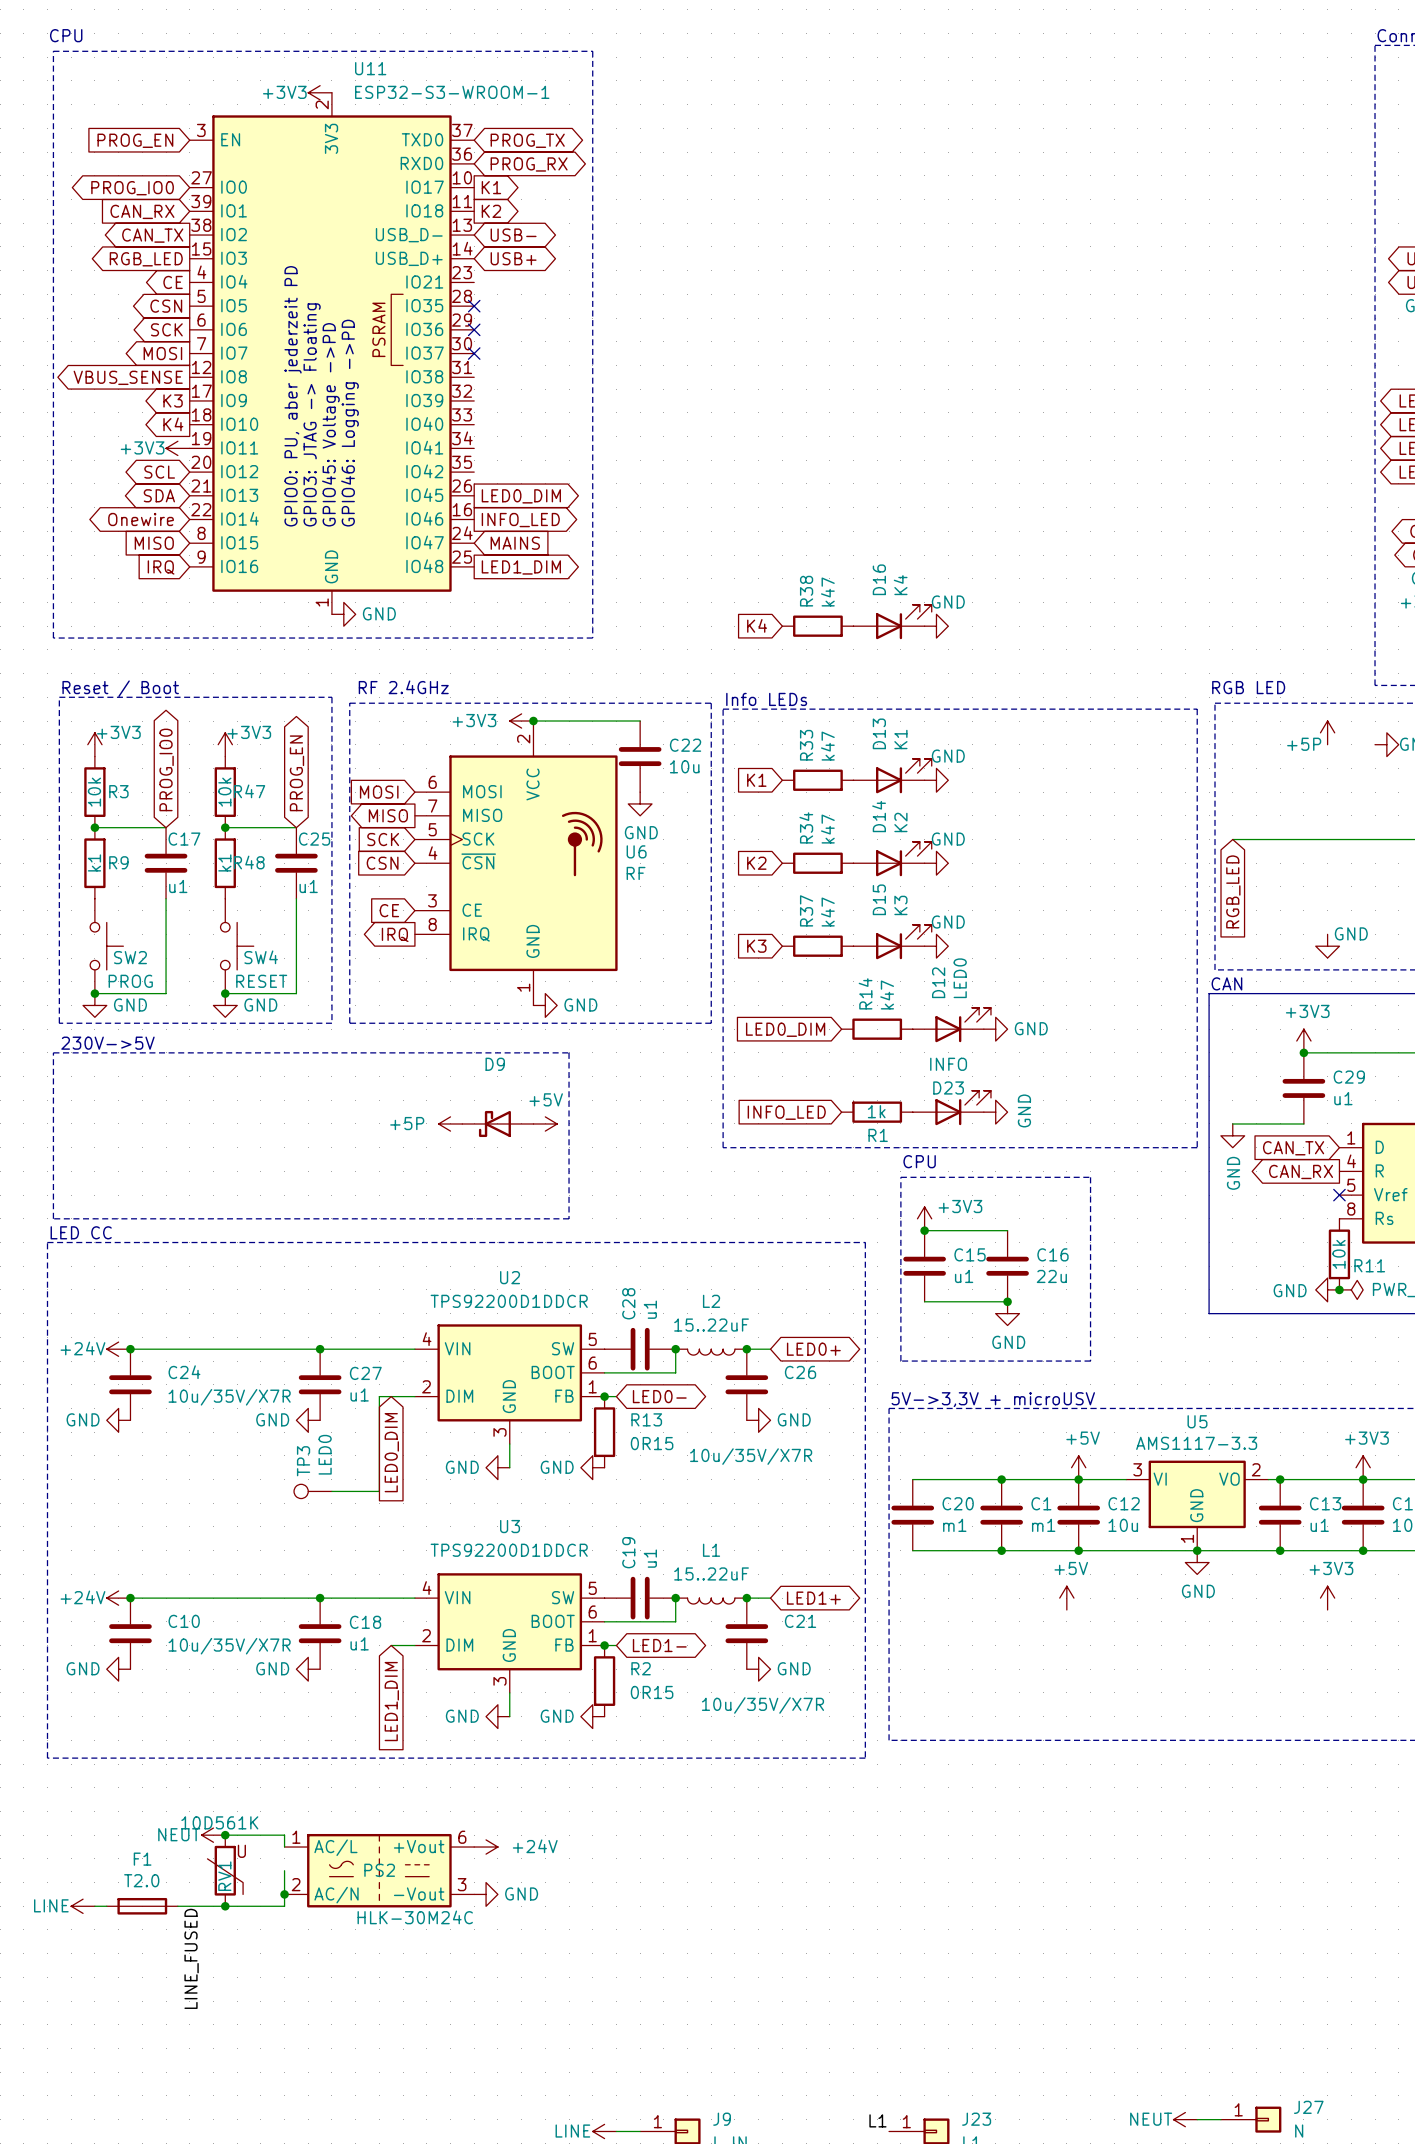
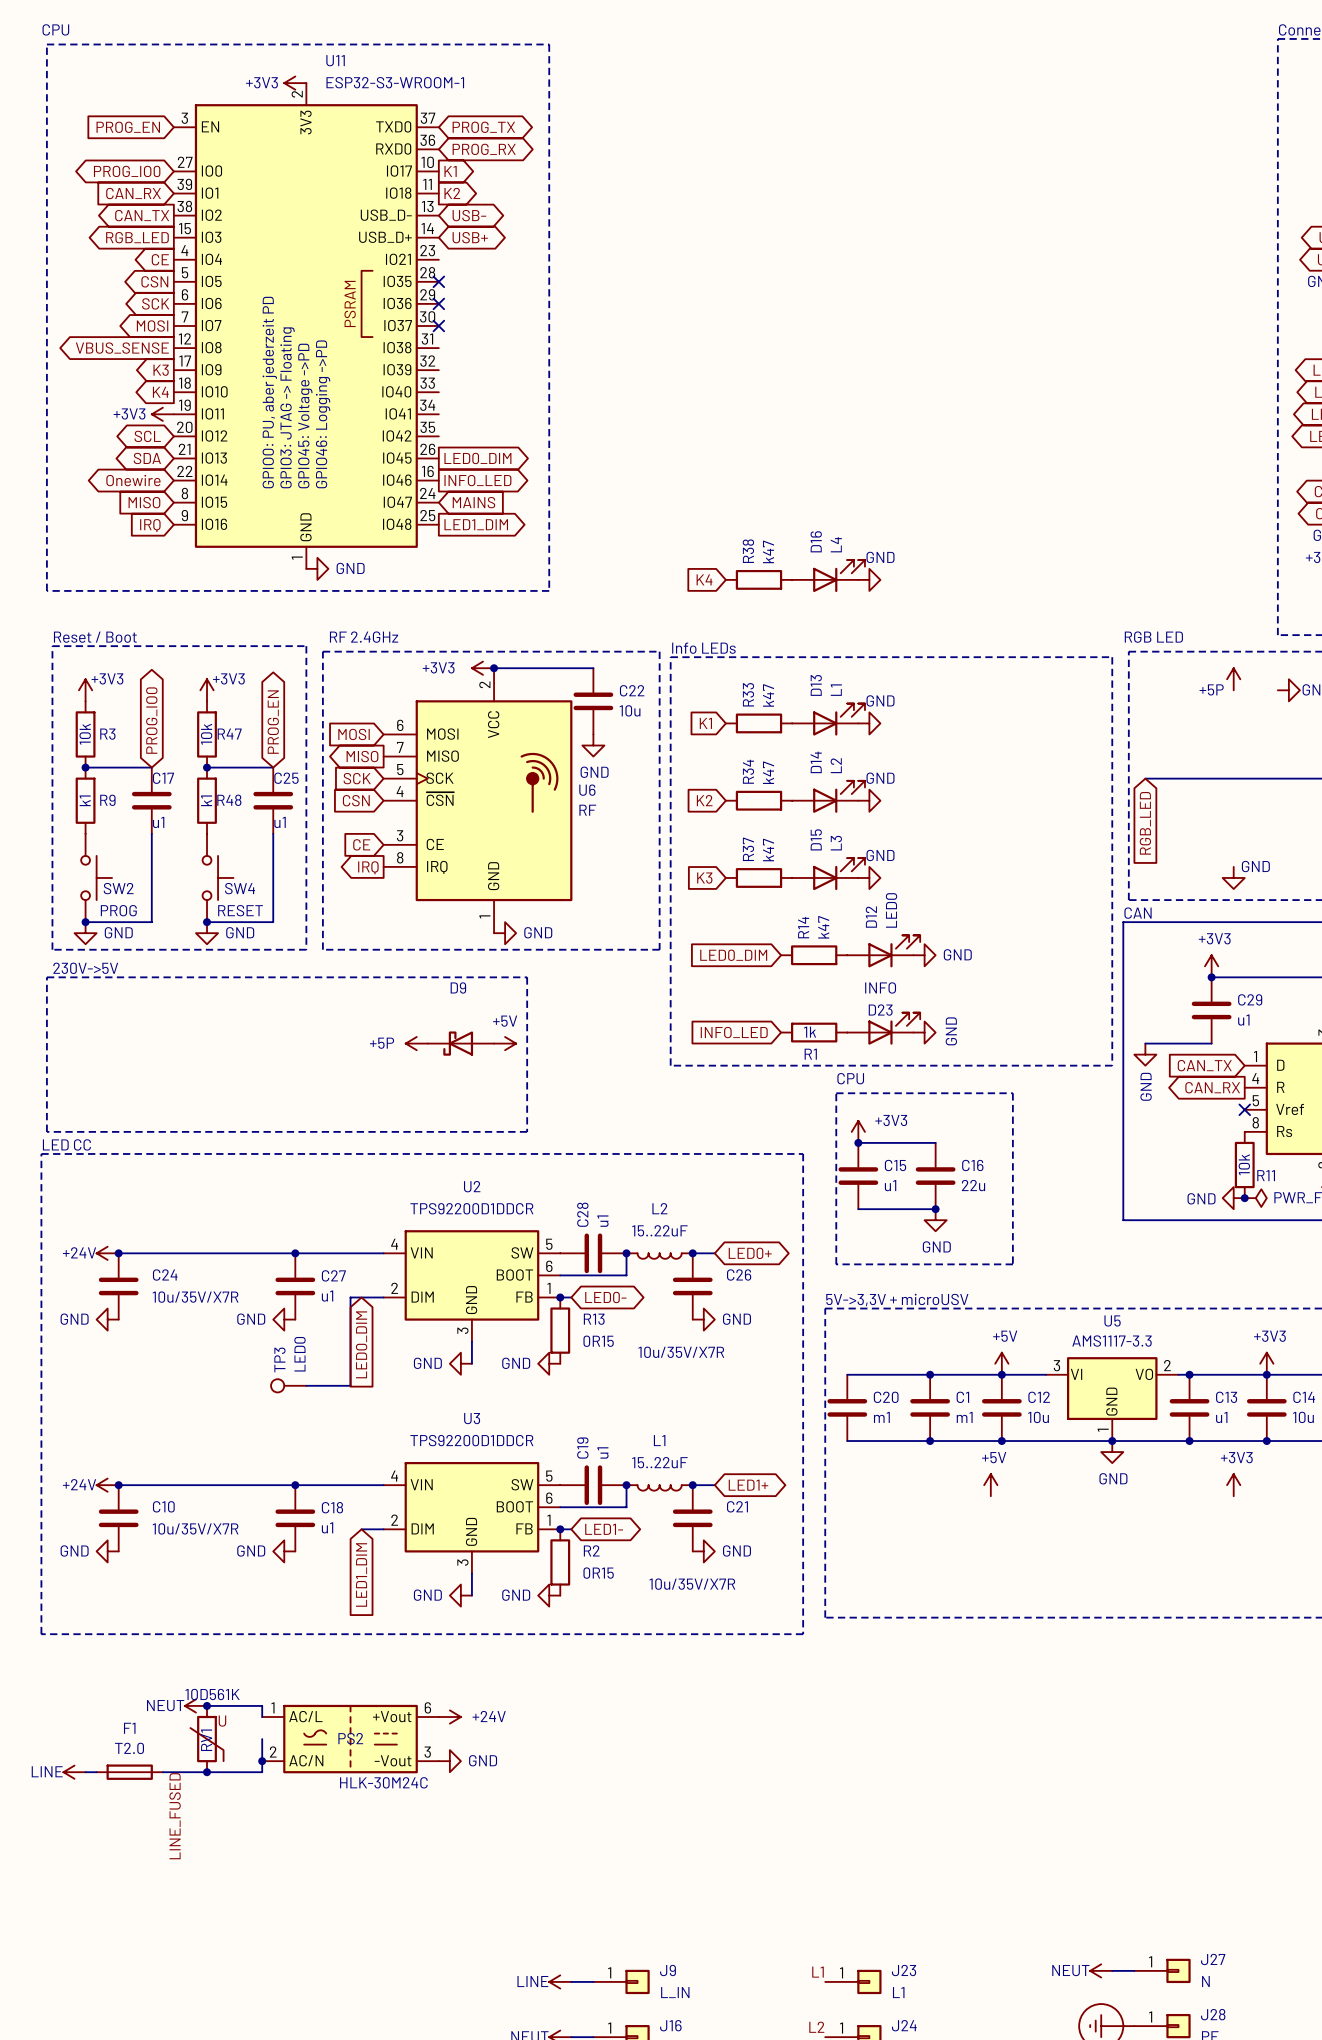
D16 value: K4 (900, 585) -> L4 (836, 544)
D13 value: K1 (900, 739) -> L1 (836, 690)
D14 value: K2 (900, 822) -> L2 (836, 765)
D15 value: K3 (900, 905) -> L3 (836, 843)

